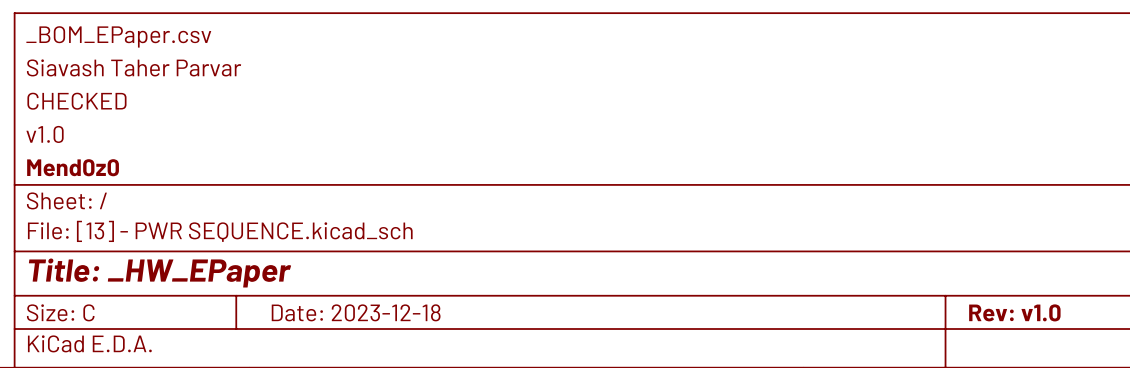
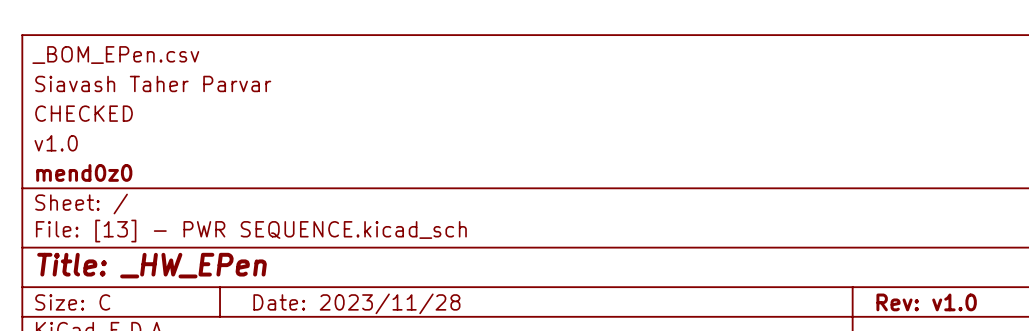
title block: _BOM_EPaper.csv (118, 36) -> _BOM_EPen.csv (115, 55)
title block: Mend0z0 (73, 167) -> mend0z0 (84, 172)
title block: Title: _HW_EPaper (160, 273) -> Title: _HW_EPen (152, 265)
title block: Date: 2023-12-18 (356, 312) -> Date: 2023/11/28 (356, 303)

